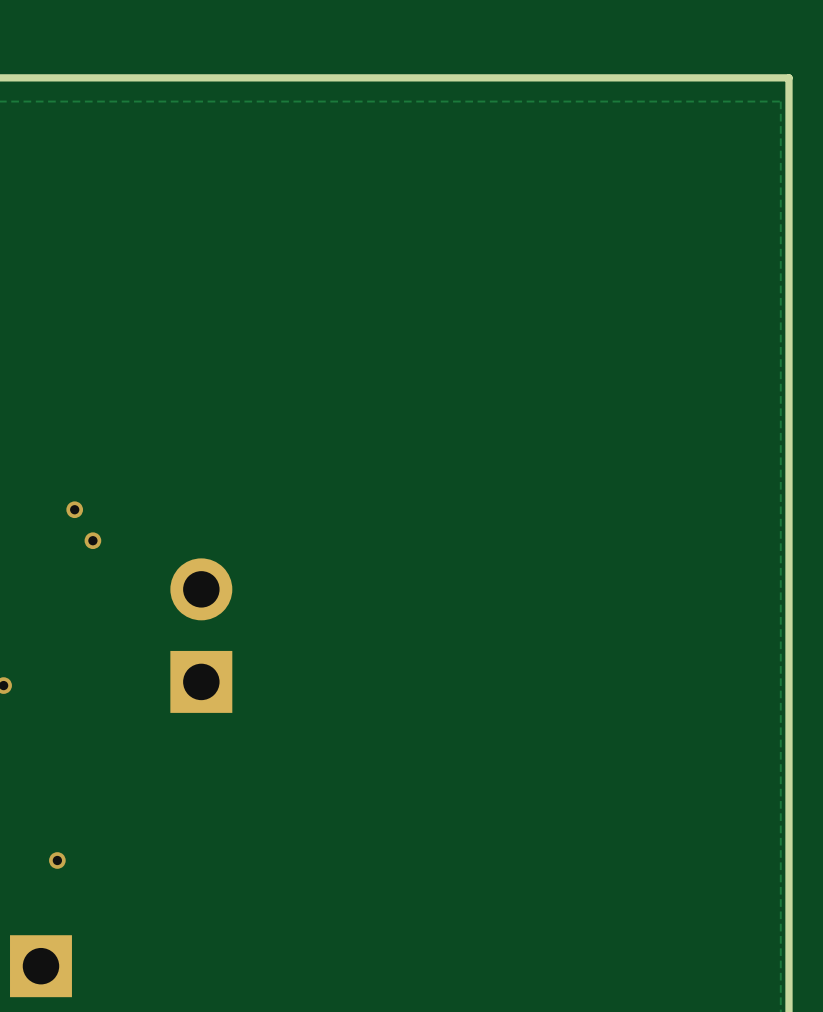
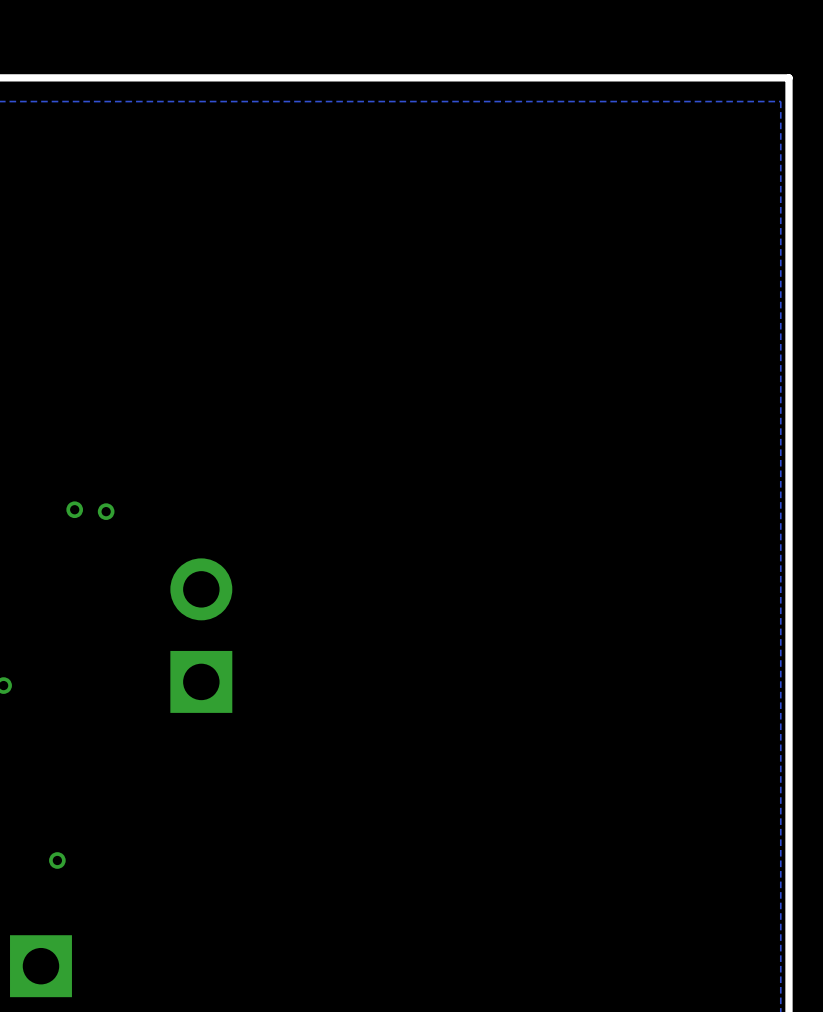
via position: (92, 540) -> (106, 511)

